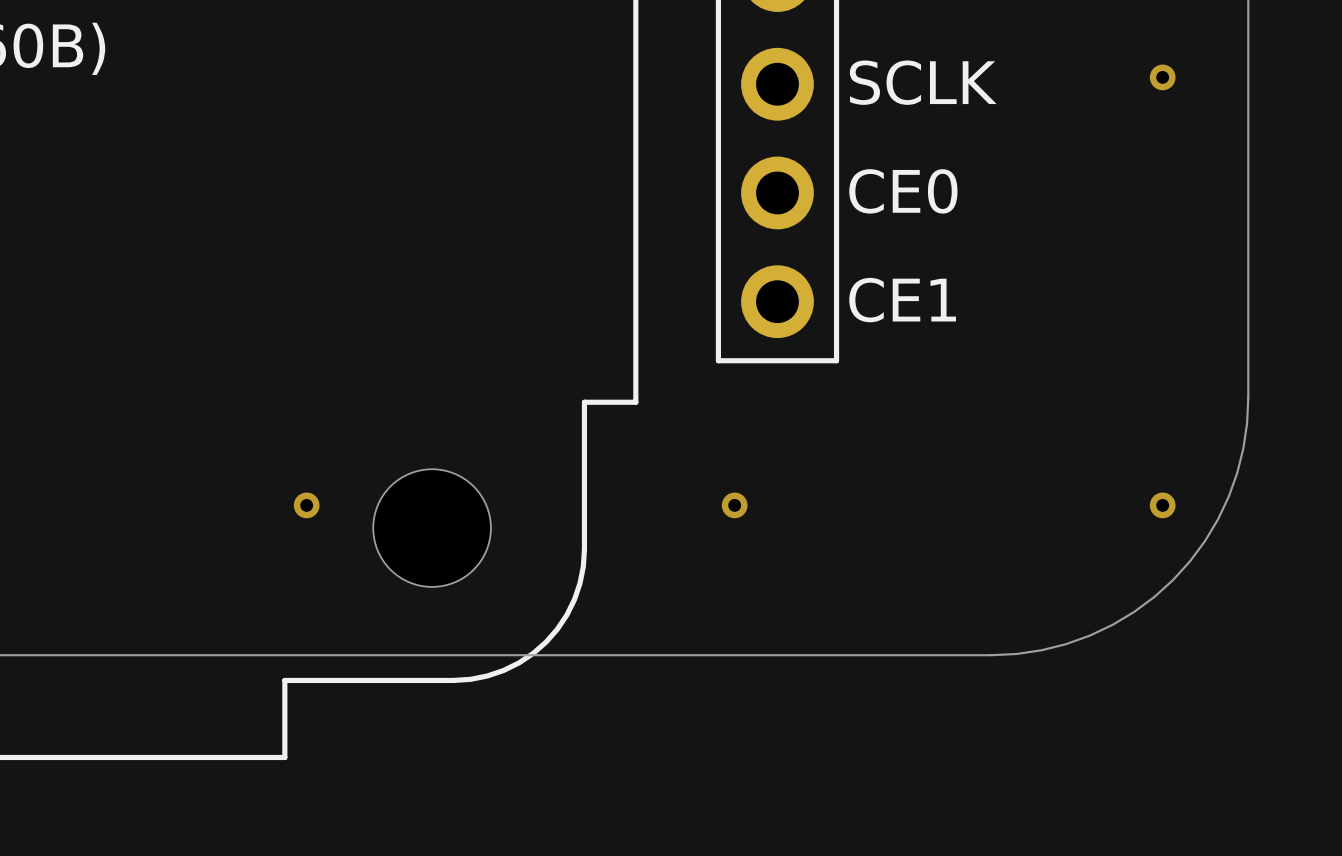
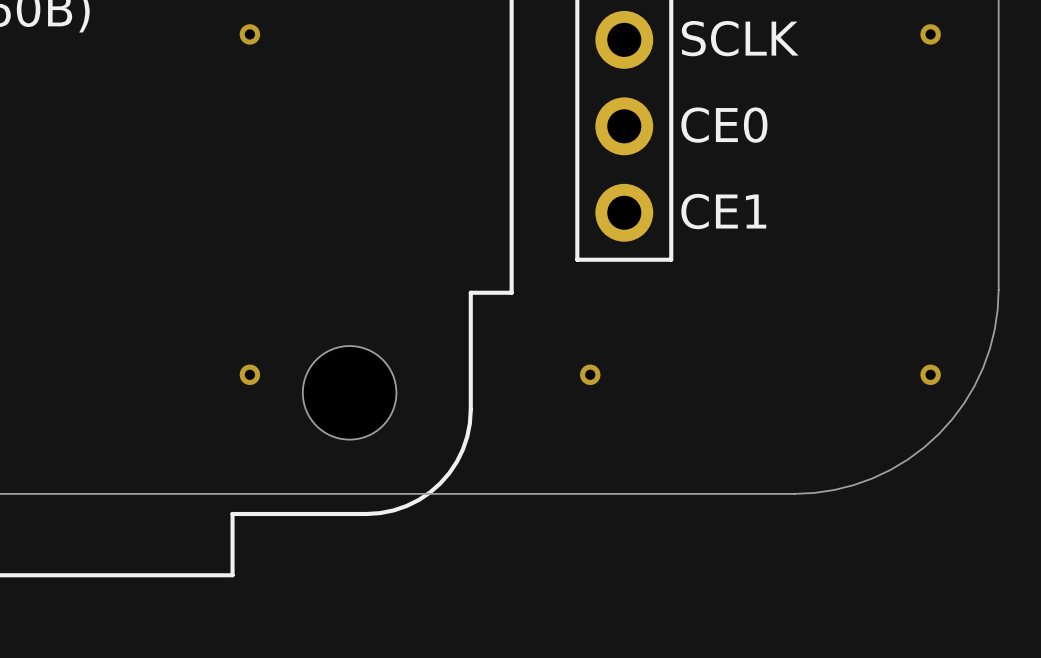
via: none -> (249, 34)

